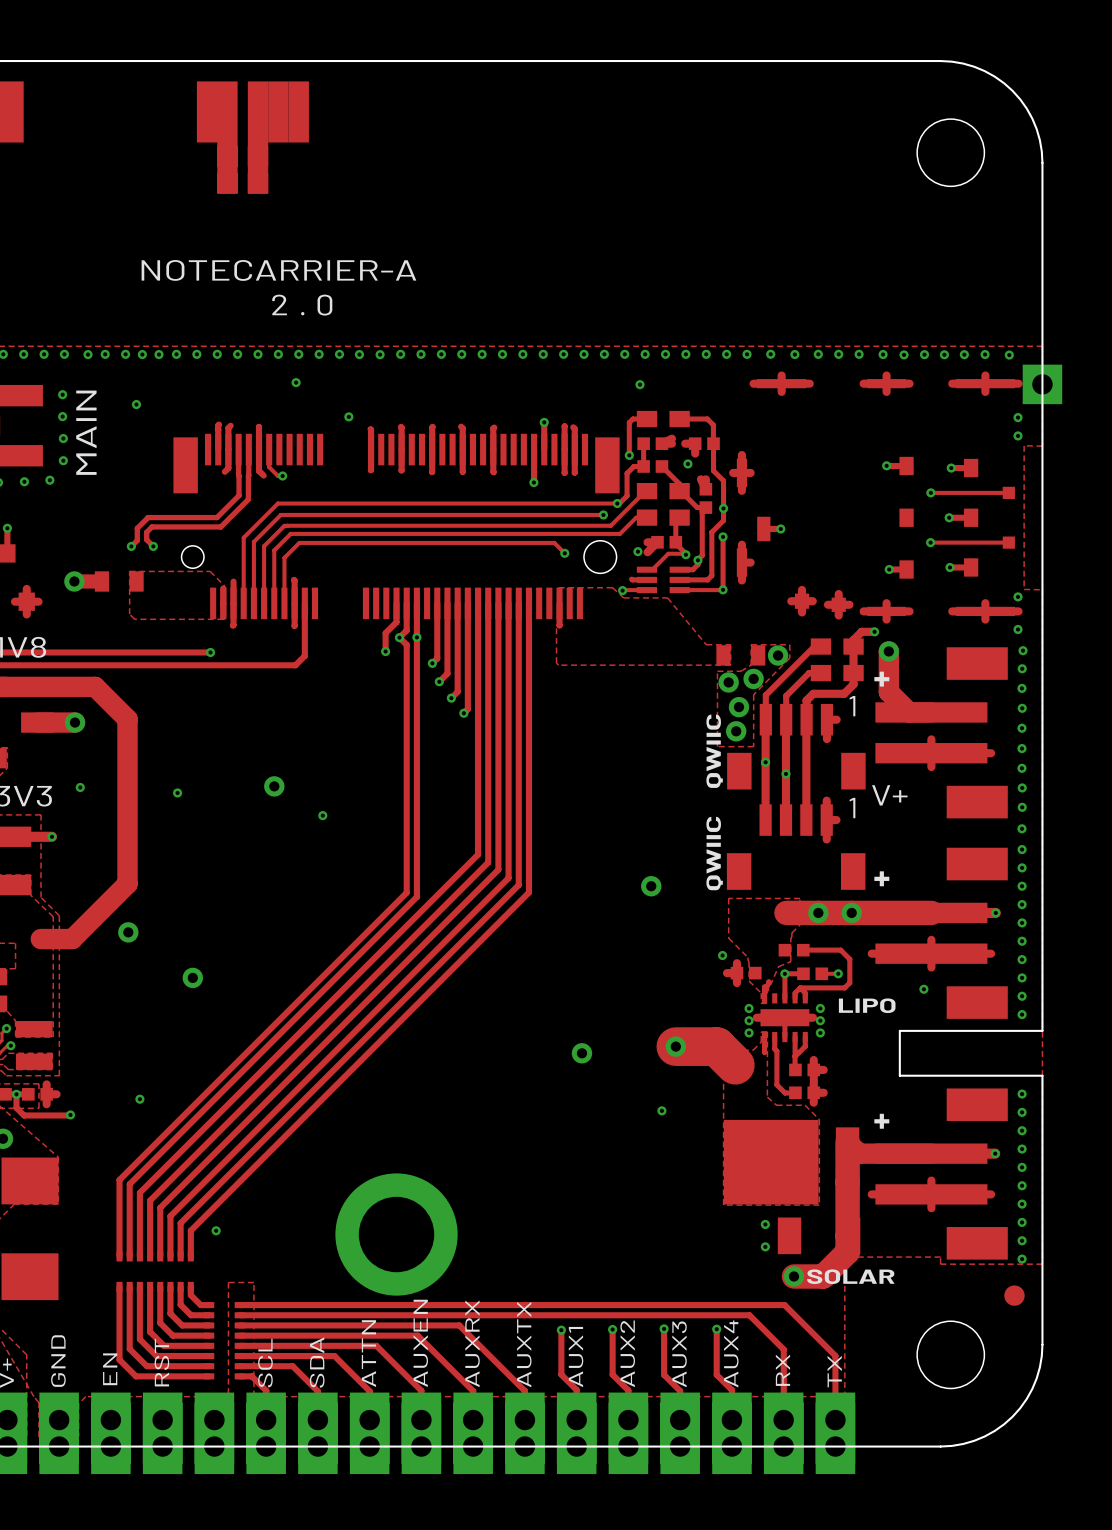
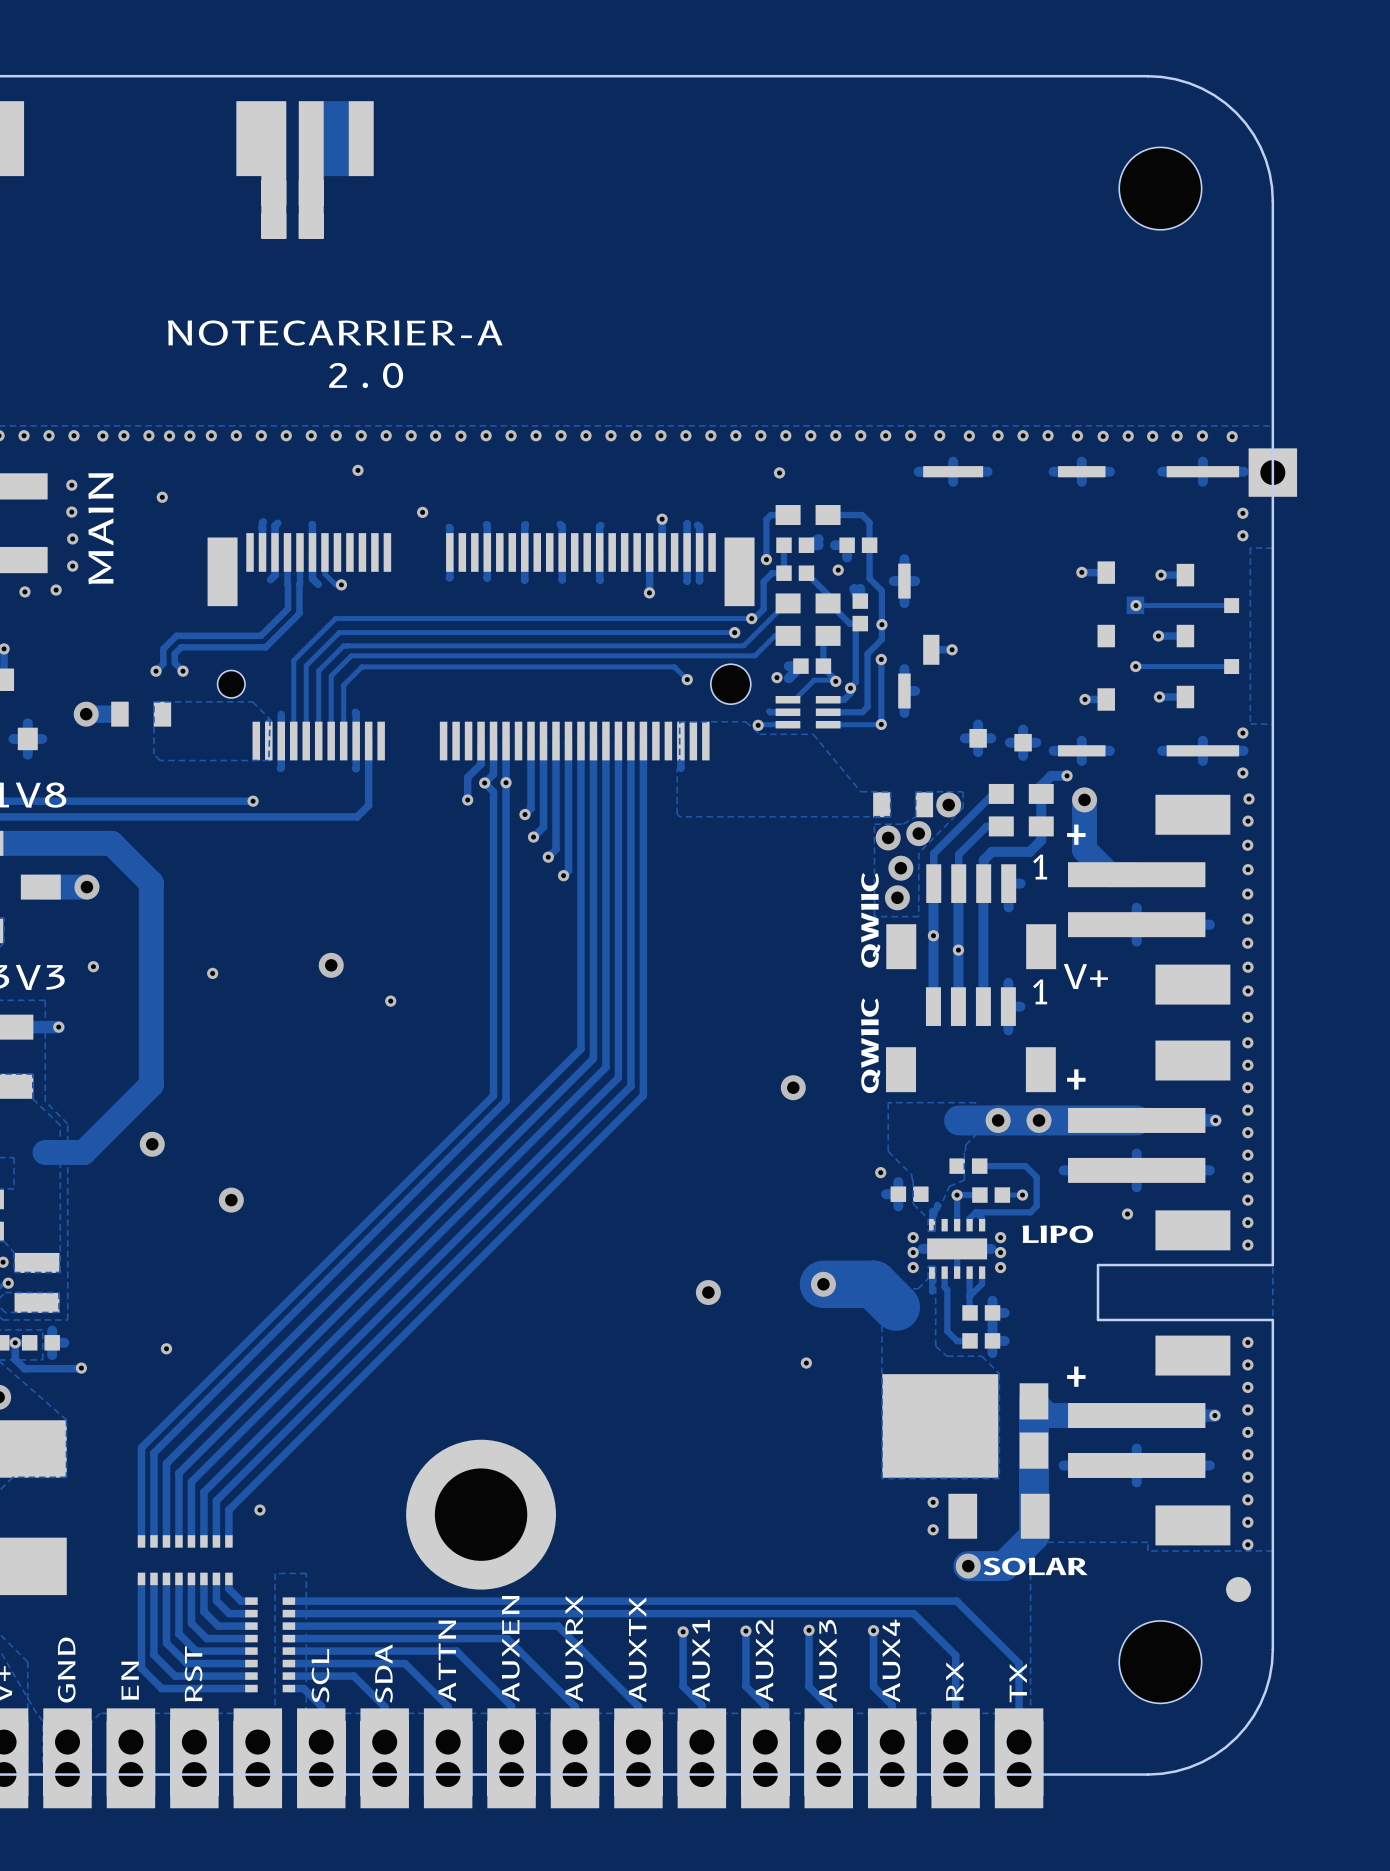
drawing: none -> [1126, 596, 1145, 615]

